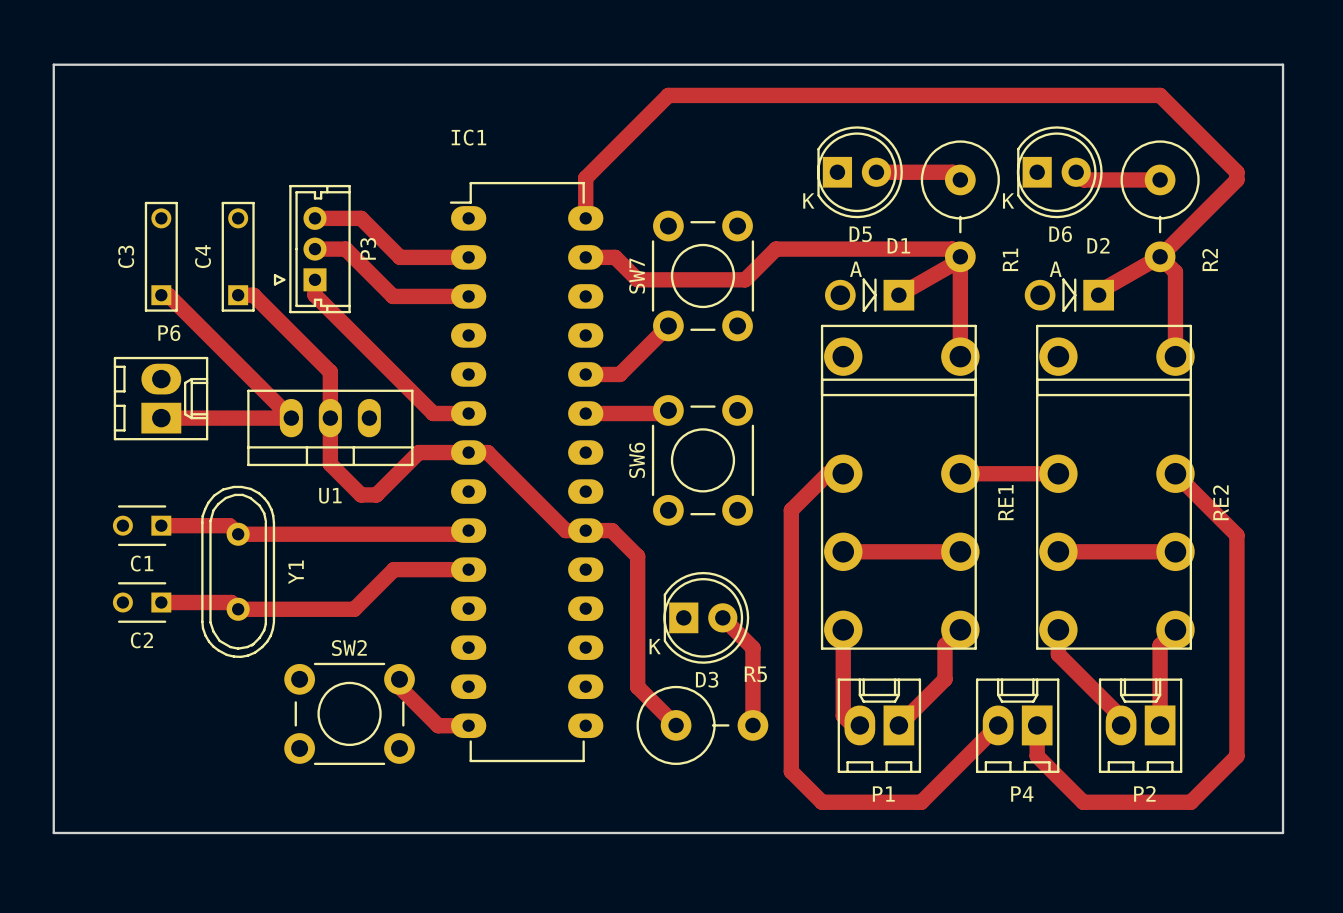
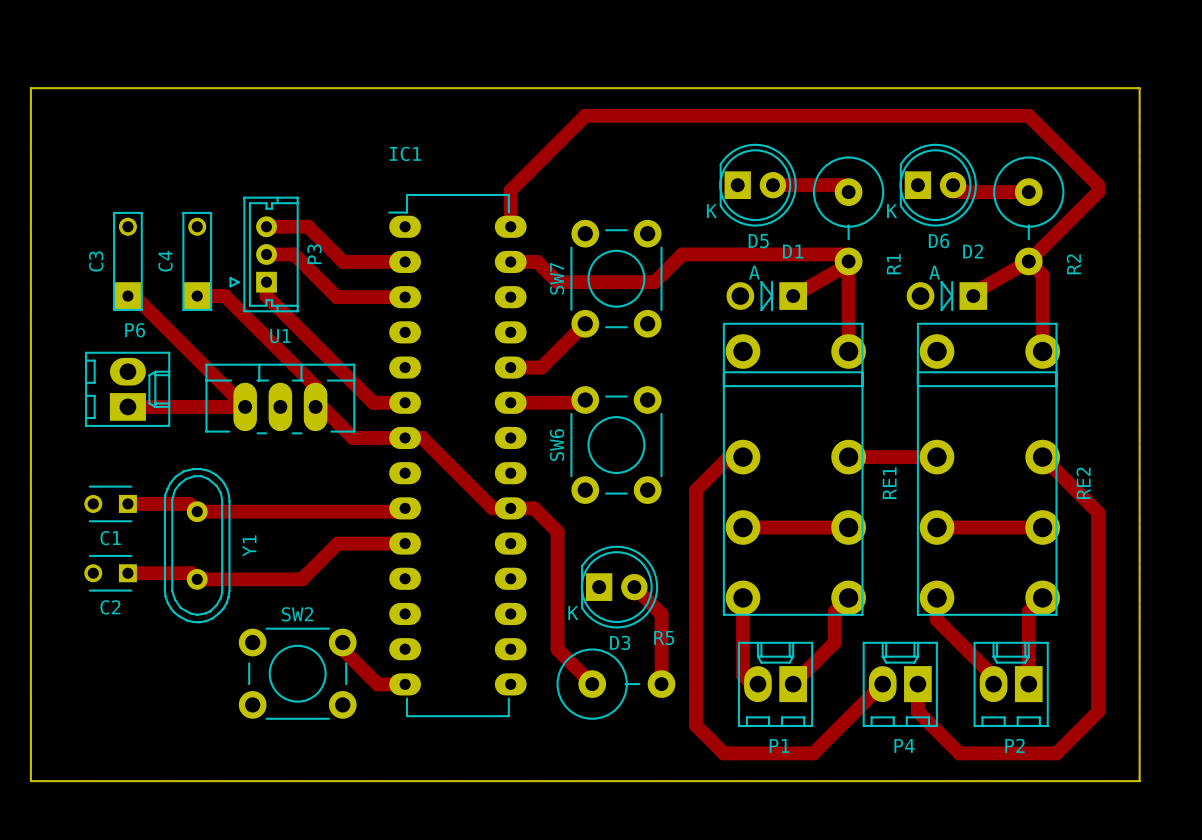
C3 footprint: [144, 201, 178, 312] -> [113, 211, 143, 311]
C4 footprint: [221, 201, 255, 312] -> [182, 211, 213, 311]
top track: (253, 295) (330, 372) (330, 464) (361, 494) (376, 494) (418, 452) -> (211, 296) (224, 296) (315, 386) (315, 406) (321, 406) (352, 437) (360, 437)
U1 footprint: [247, 389, 414, 467] -> [205, 363, 356, 435]
U1 name position: U1 (330, 495) -> U1 (280, 336)

